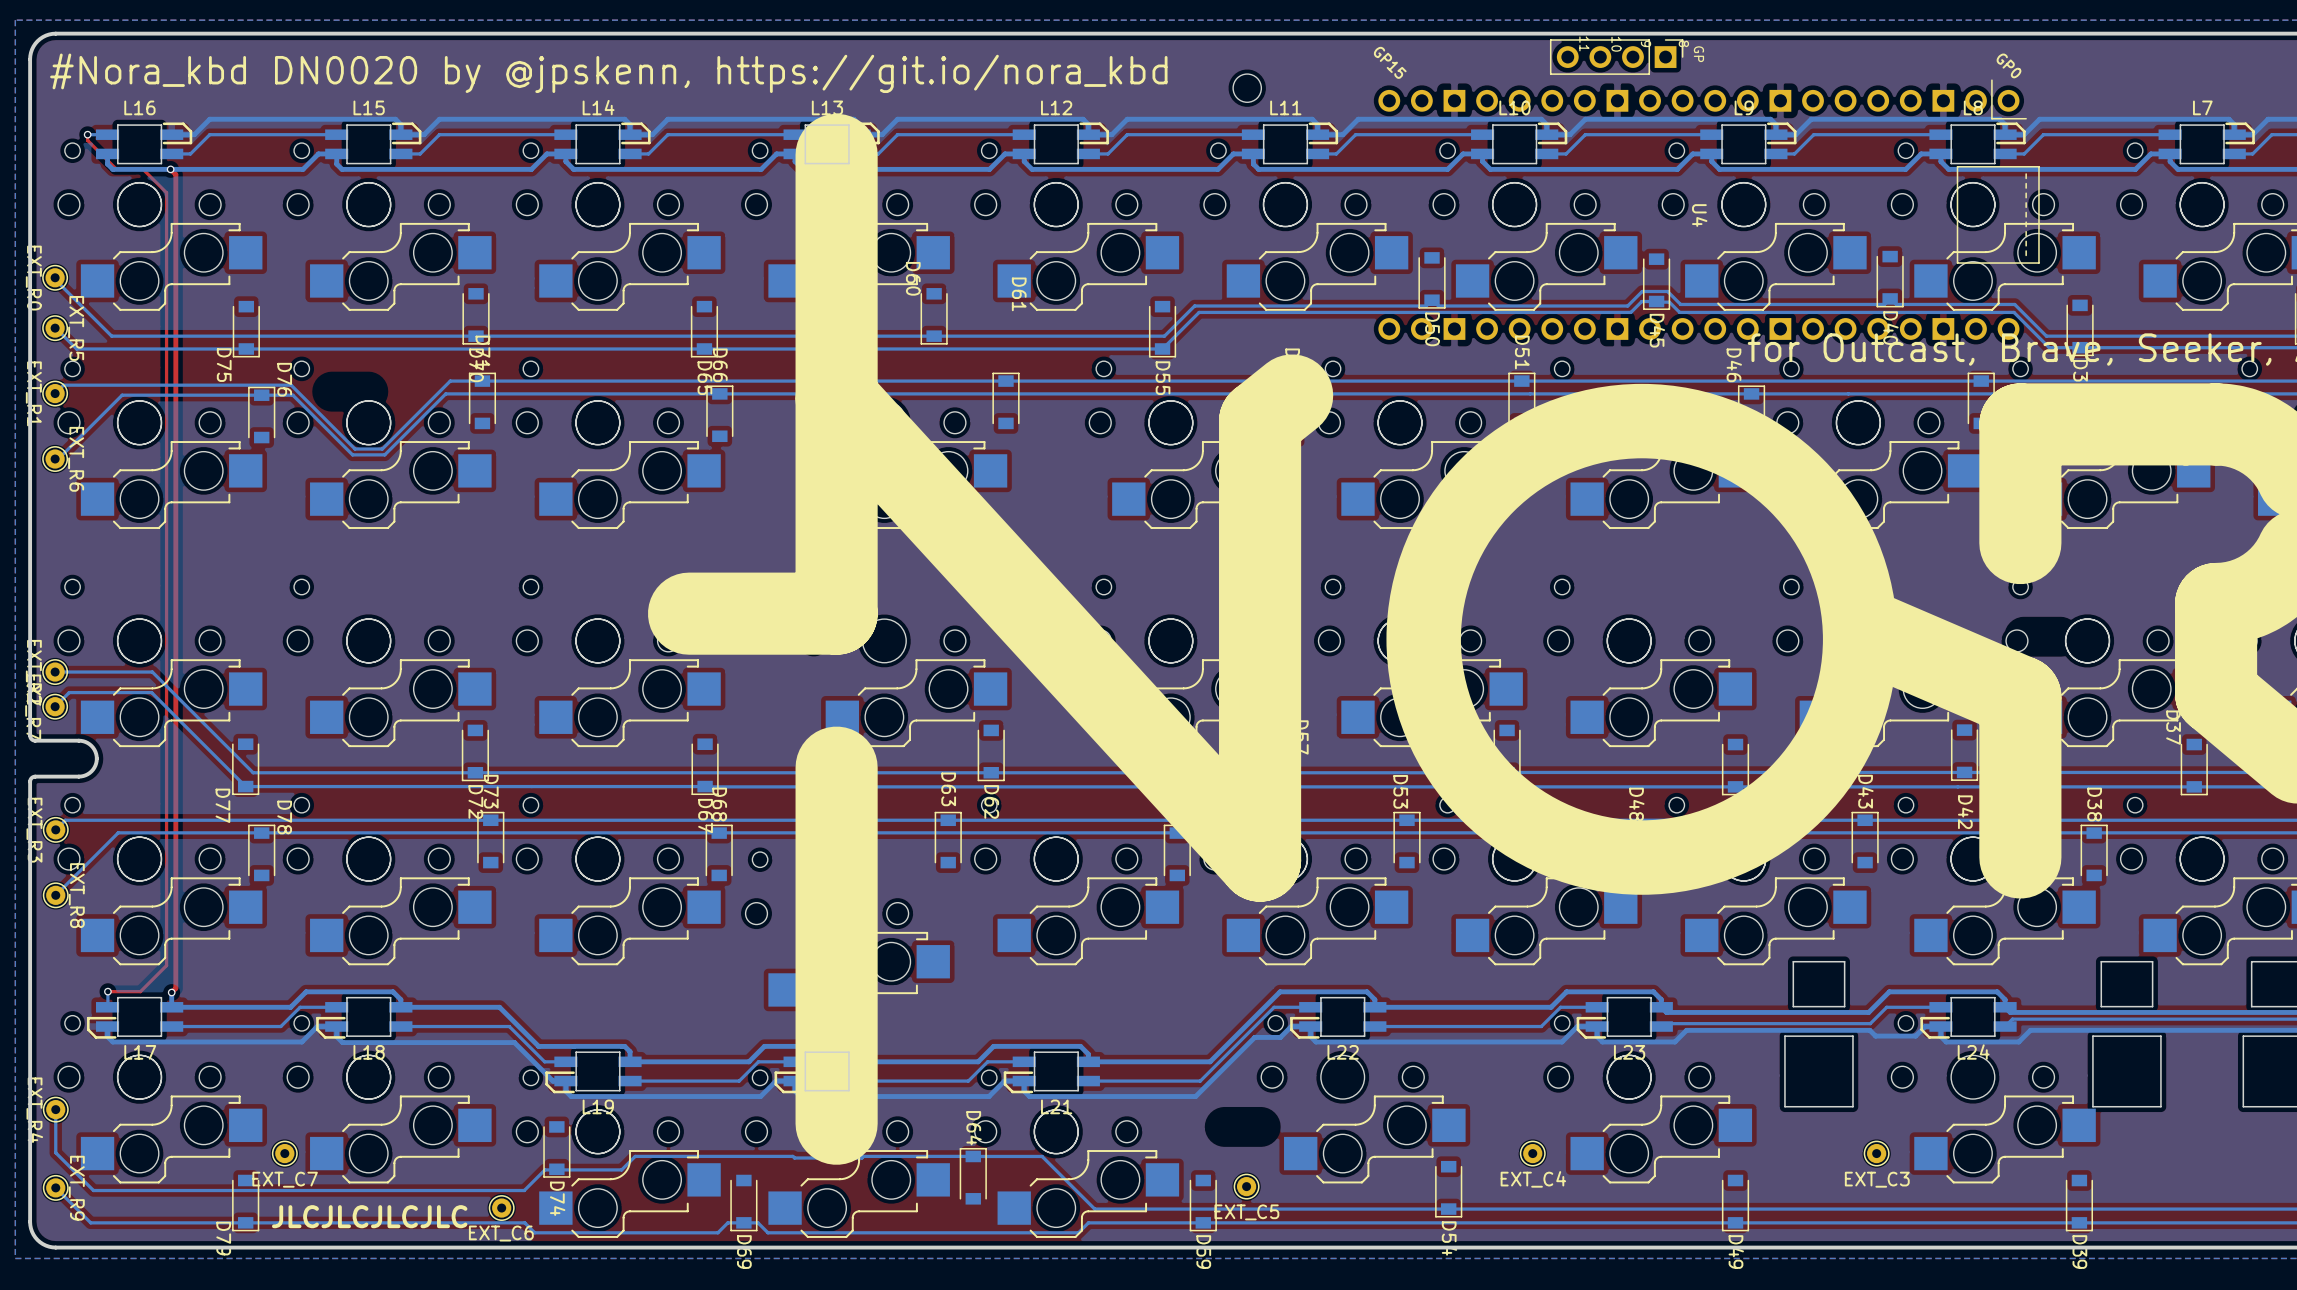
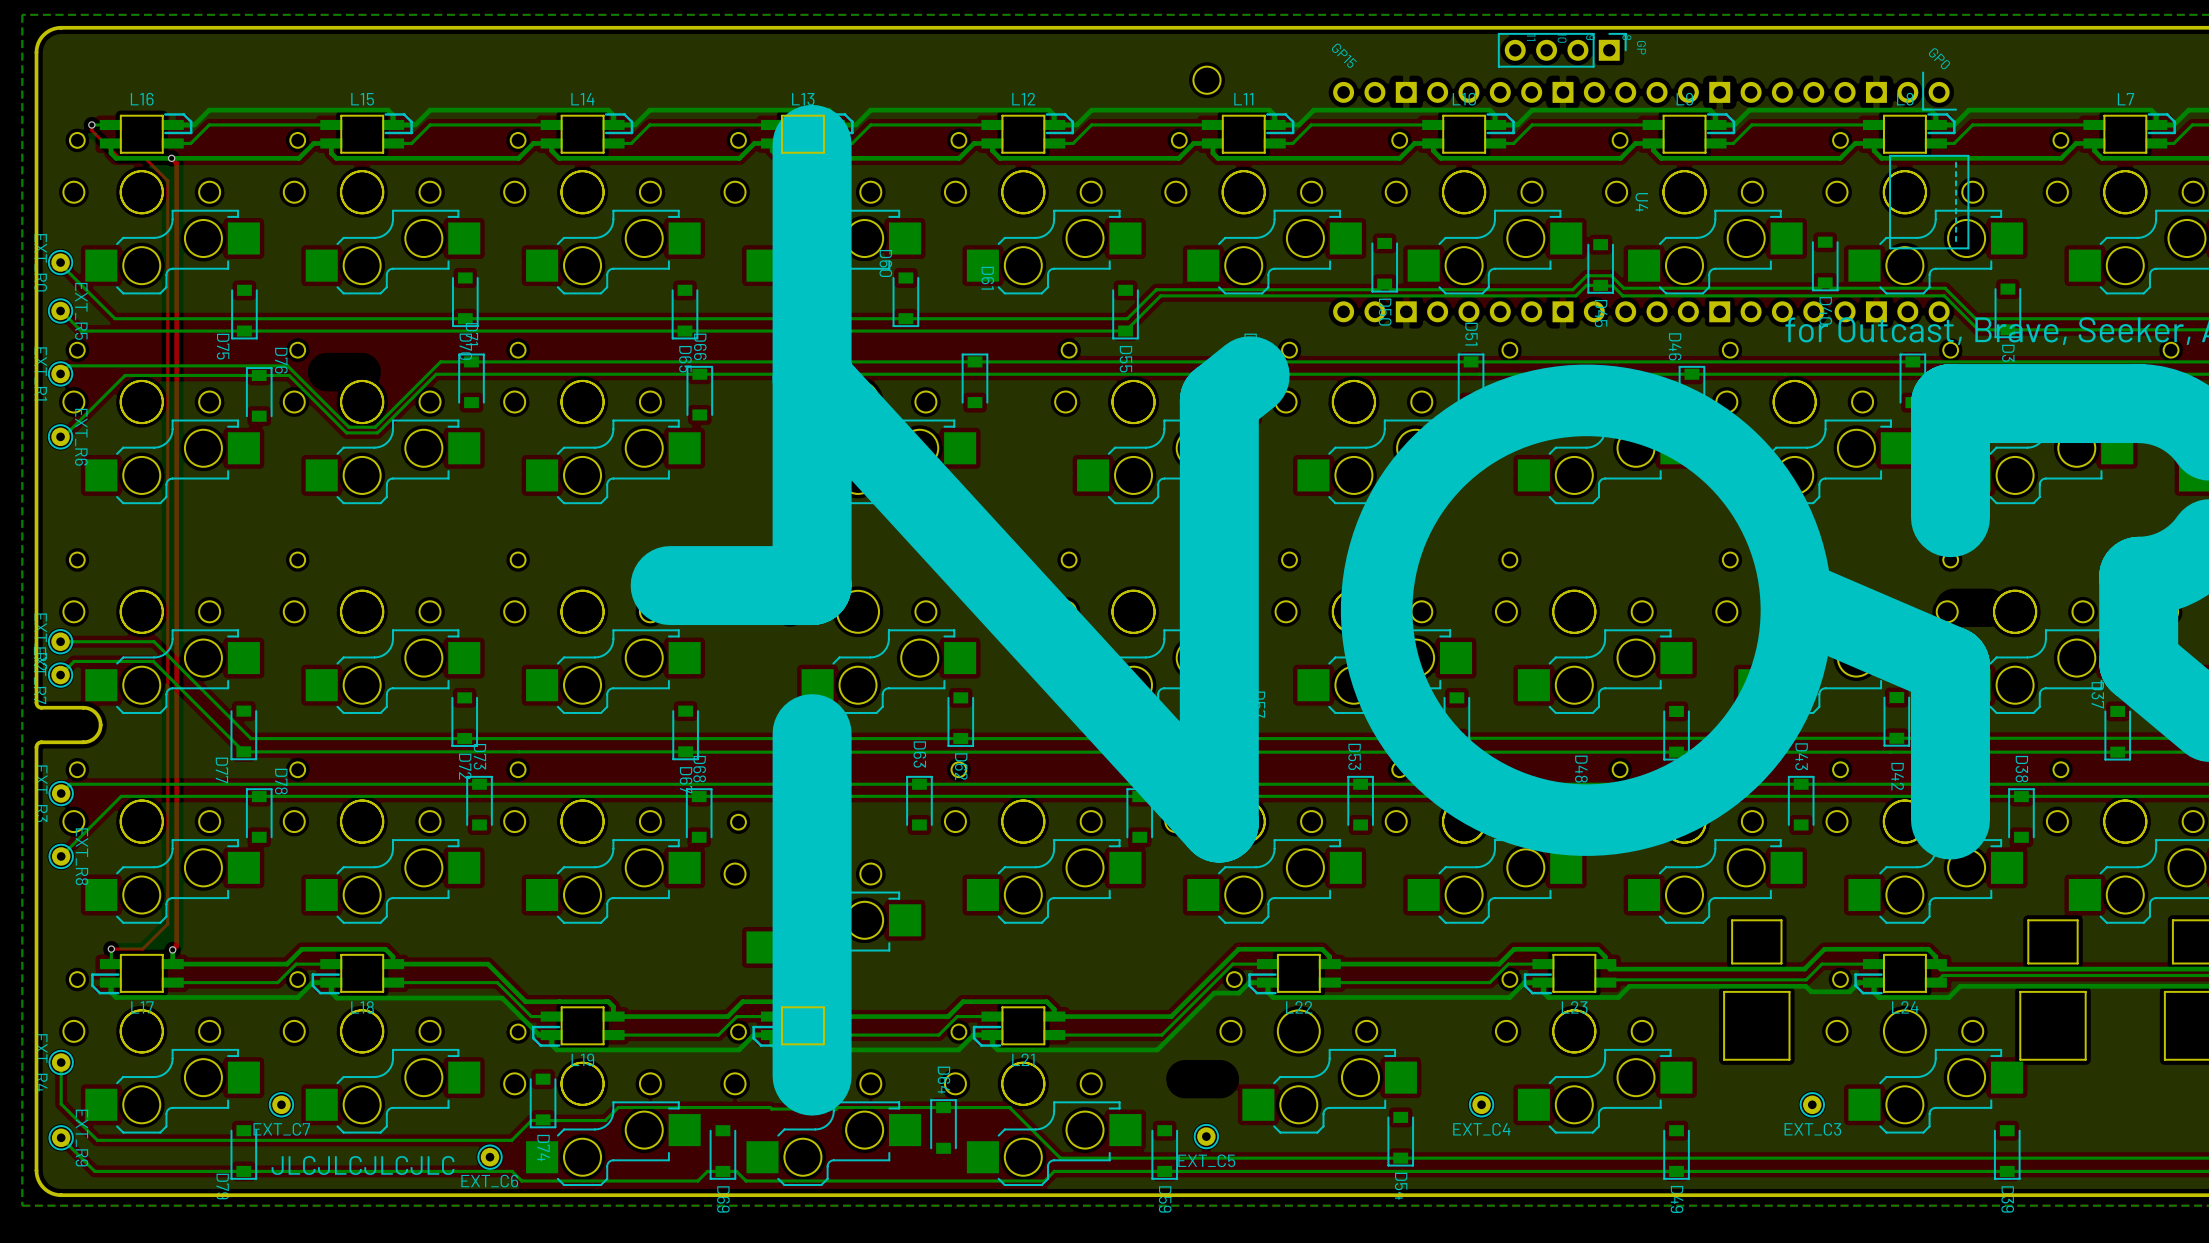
text: #Nora_kbd DN0020 by @jpskenn, https://git.io/nora_kbd (608, 73) -> none

